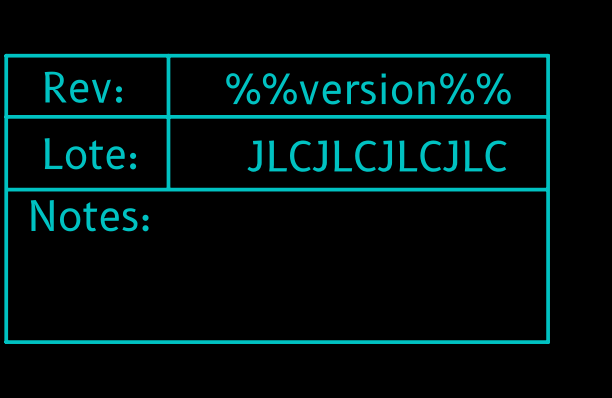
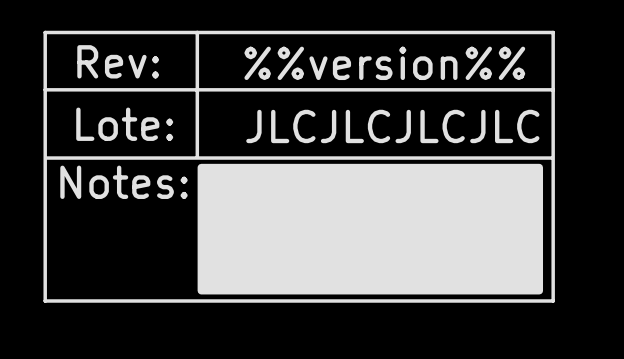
drawing: none -> [197, 163, 544, 295]

